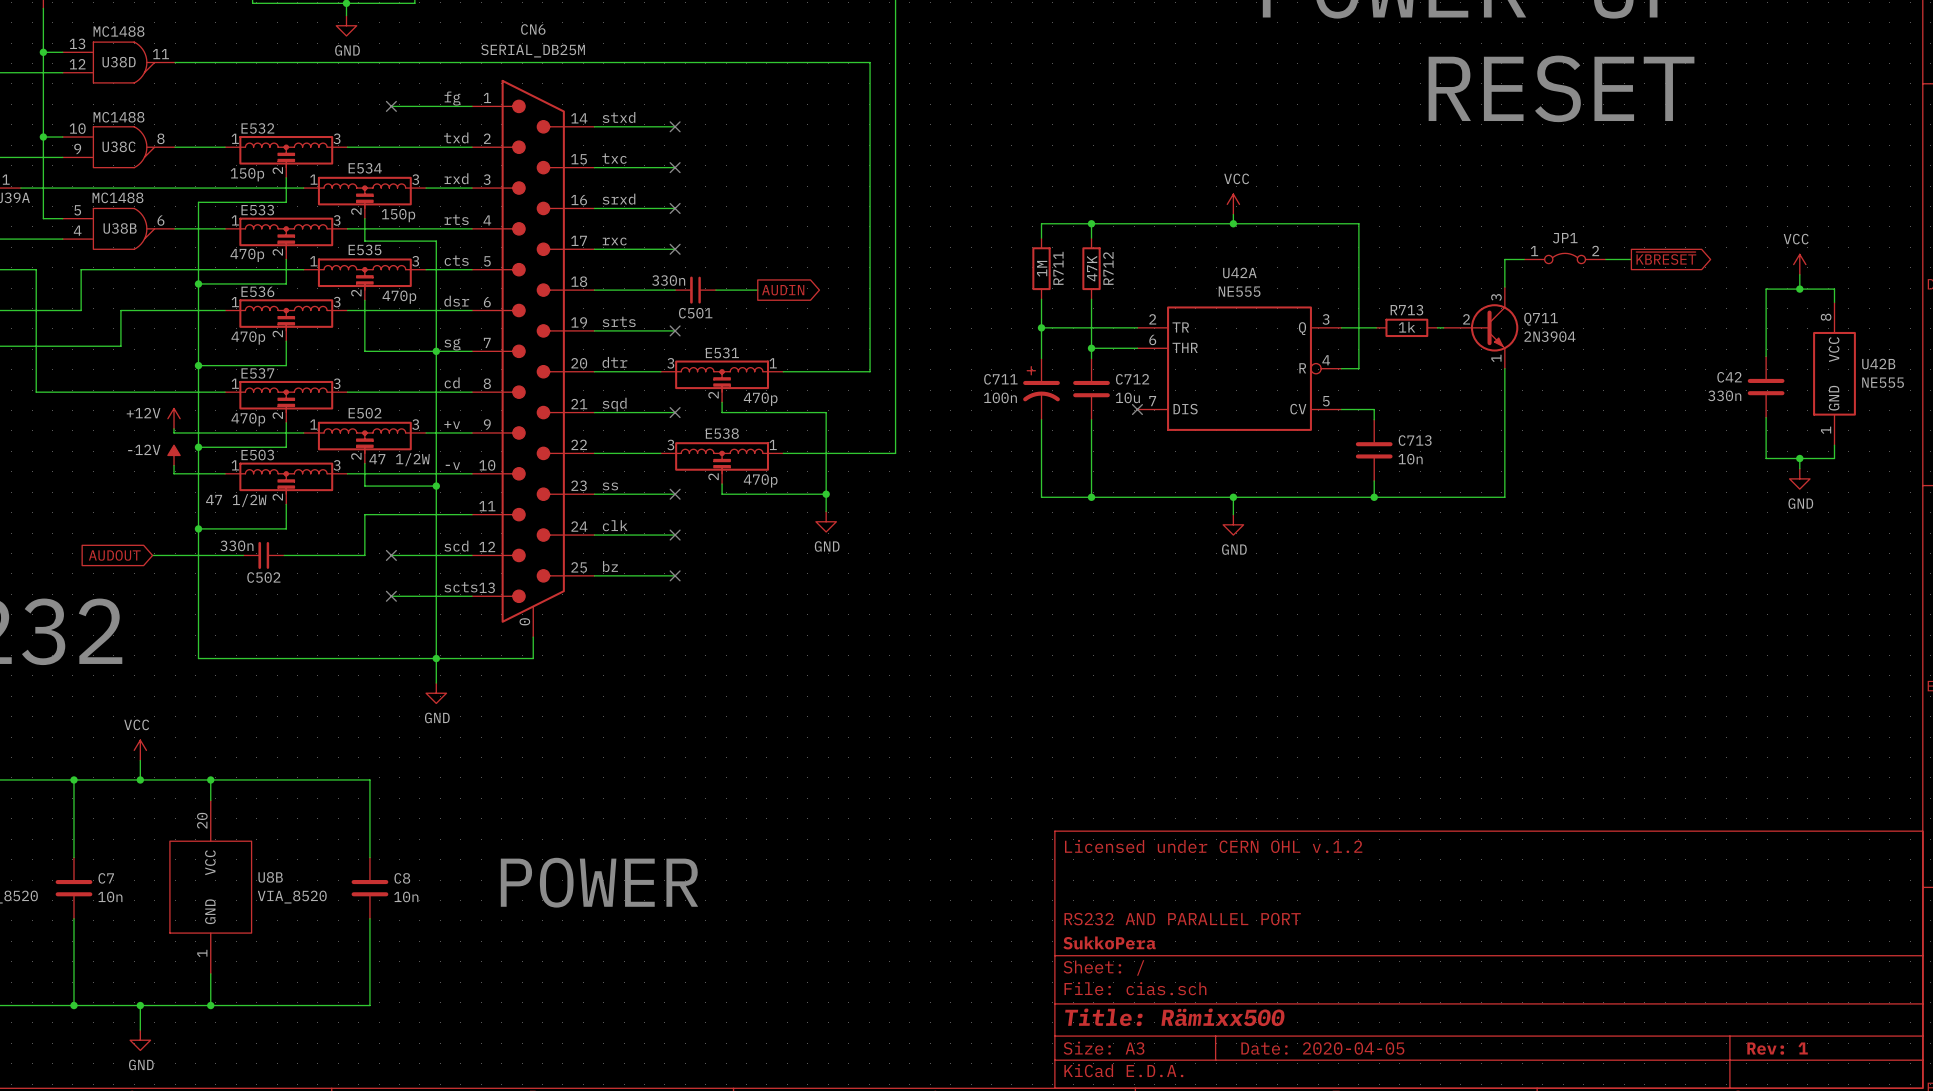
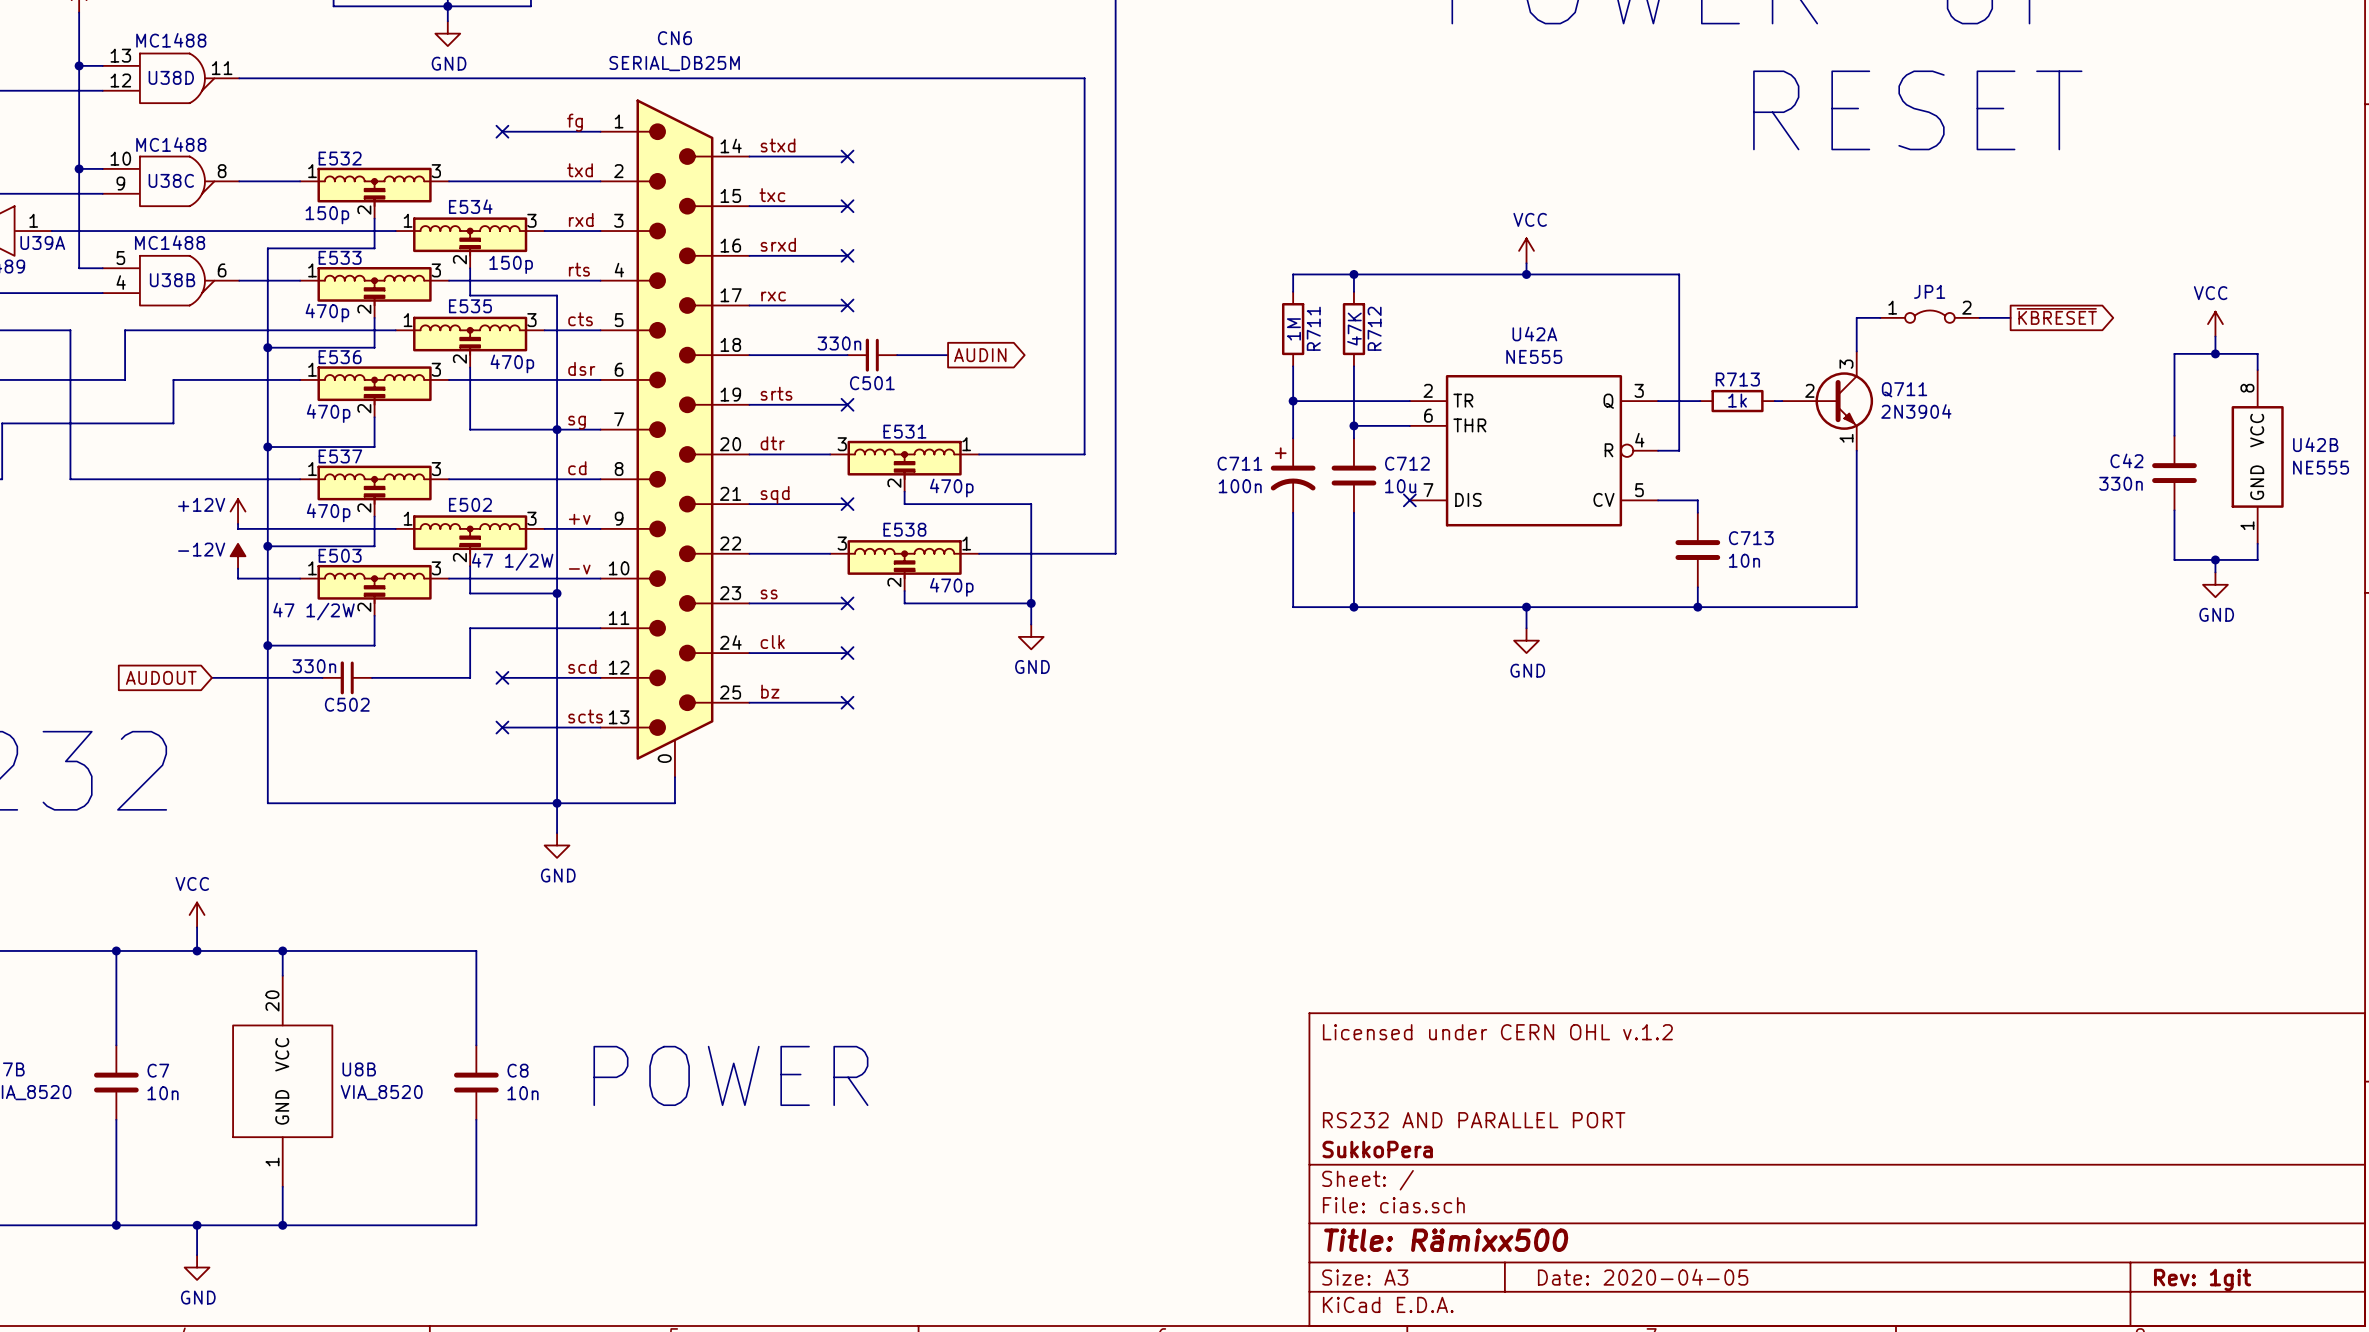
title block: Rev: 1 (1777, 1048) -> Rev: 1git (2202, 1280)

